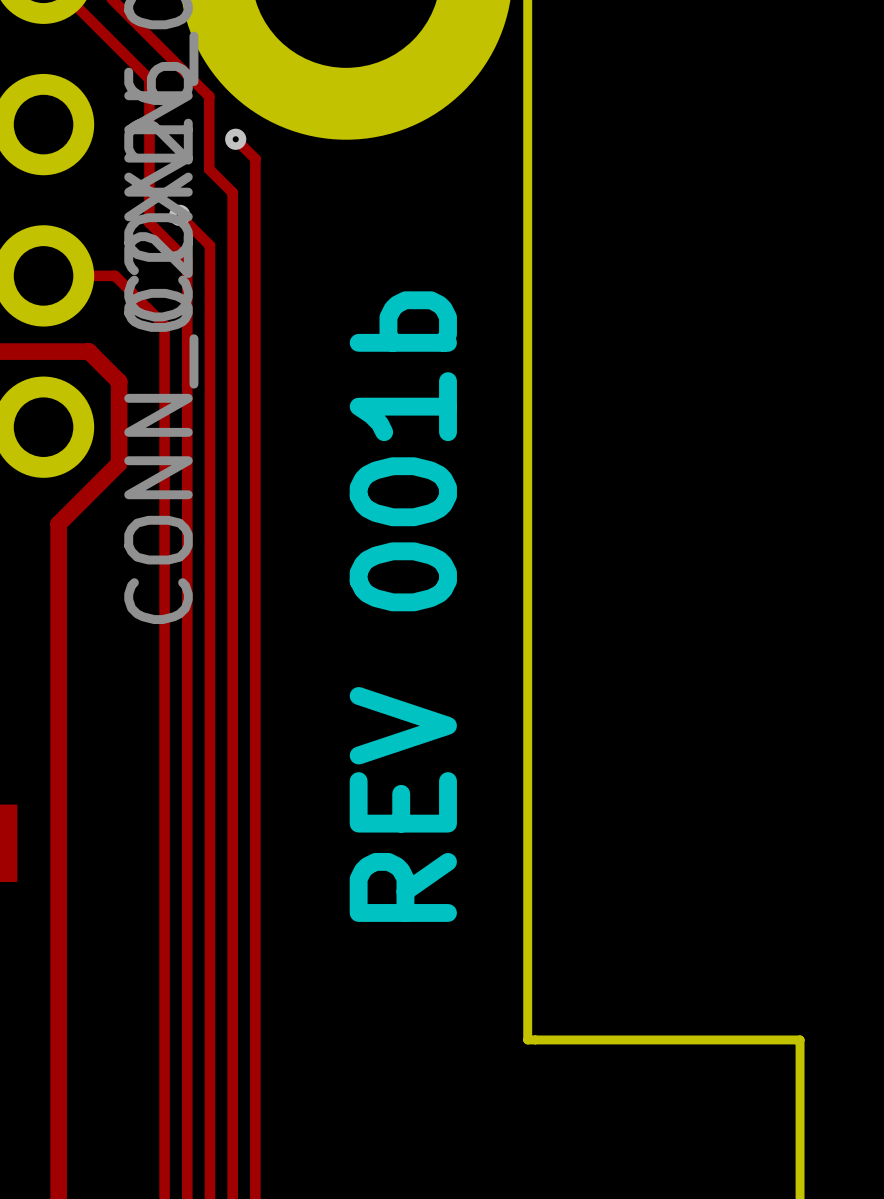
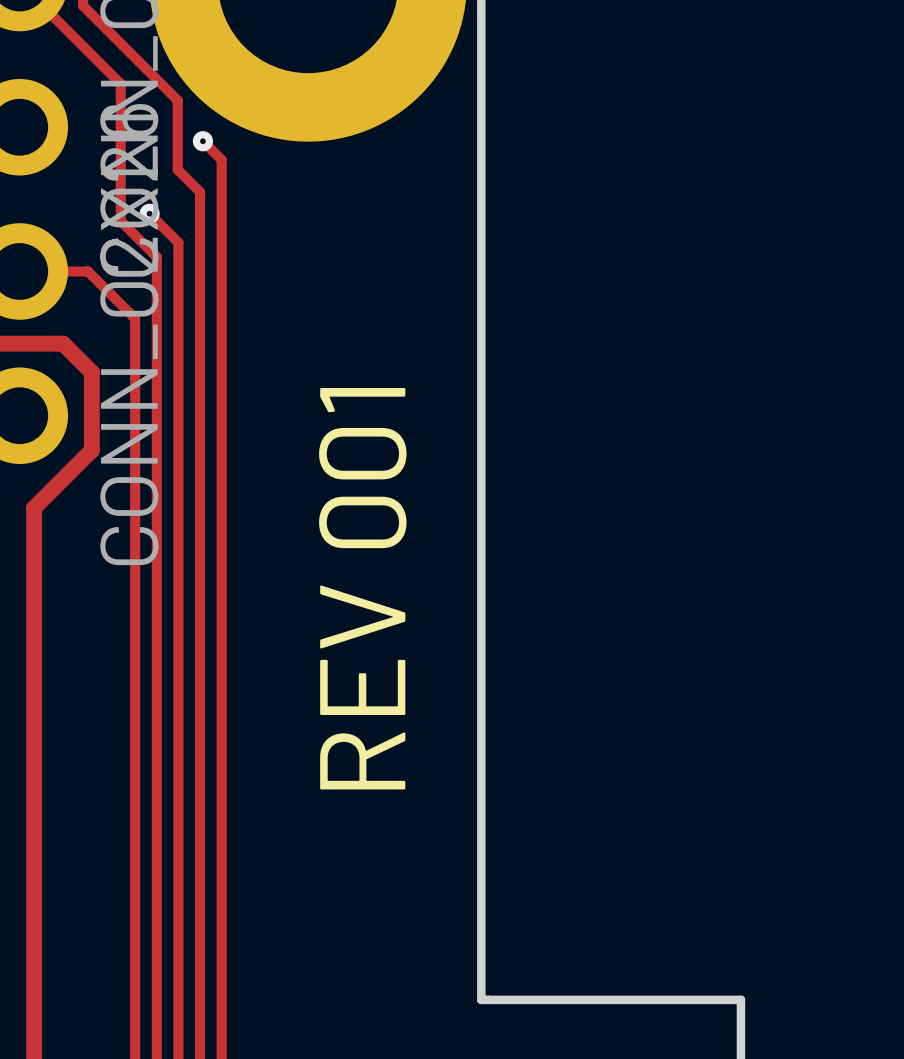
text: REV 001b (403, 606) -> REV 001 (362, 588)

